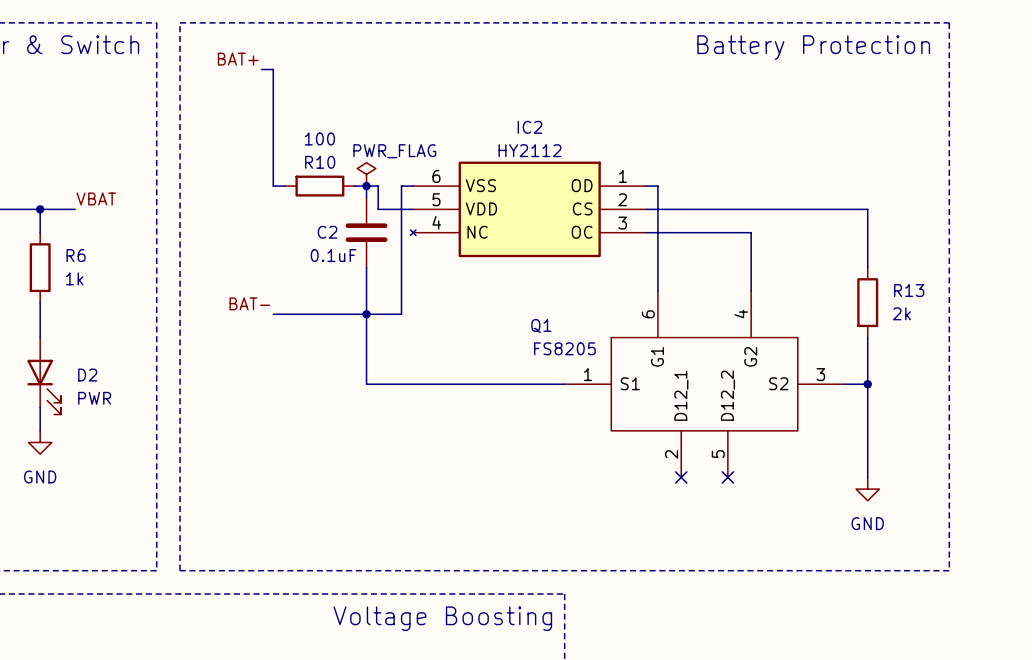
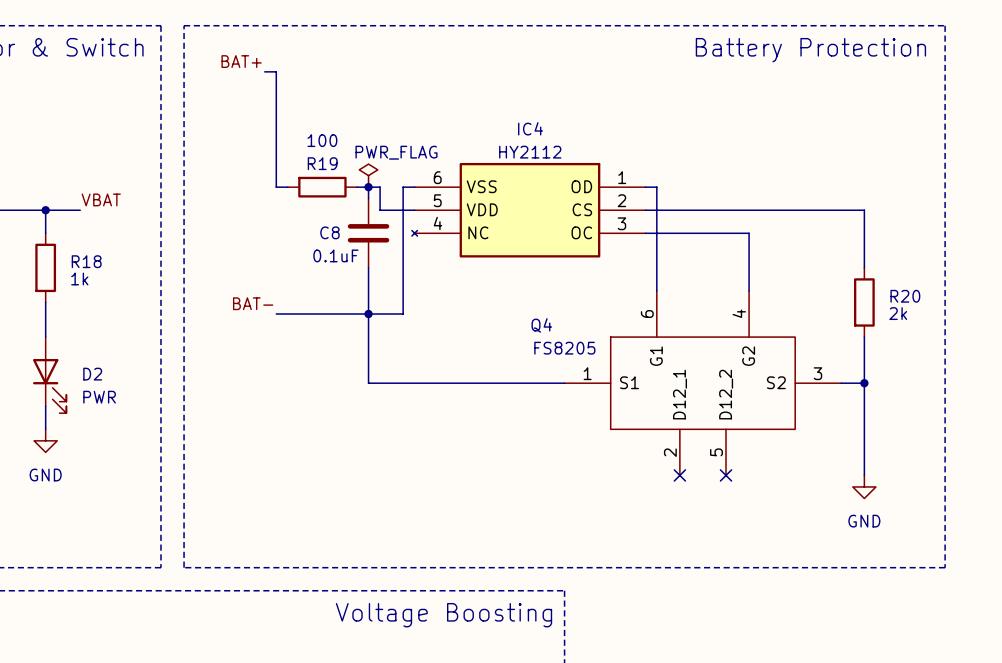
IC2 name: IC2 (529, 127) -> IC4 (530, 128)
R10 name: R10 (320, 162) -> R19 (322, 163)
C2 name: C2 (327, 232) -> C8 (329, 232)
R6 name: R6 (76, 255) -> R18 (86, 261)
R13 name: R13 (909, 290) -> R20 (905, 296)
Q1 name: Q1 (541, 326) -> Q4 (541, 325)

